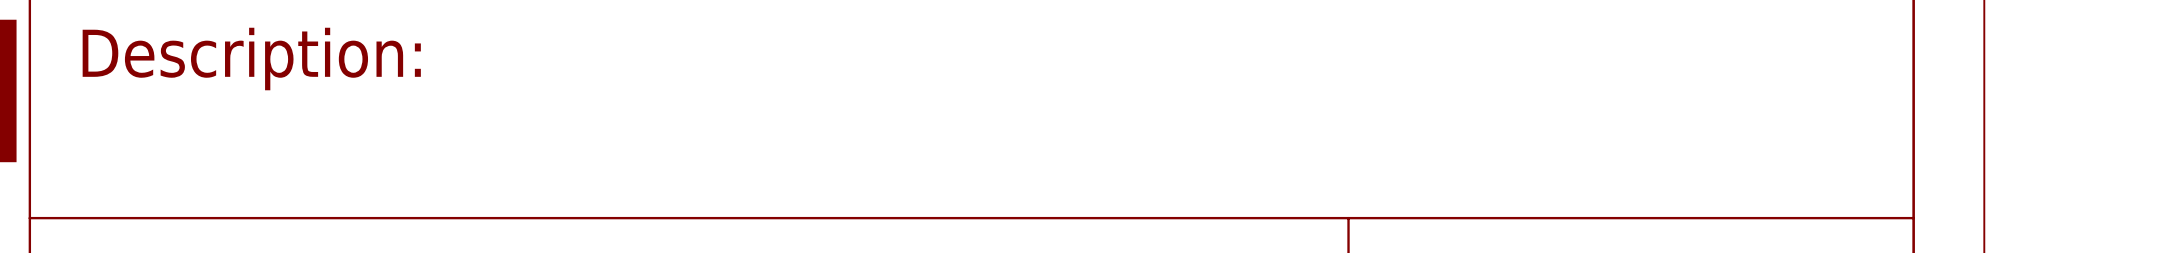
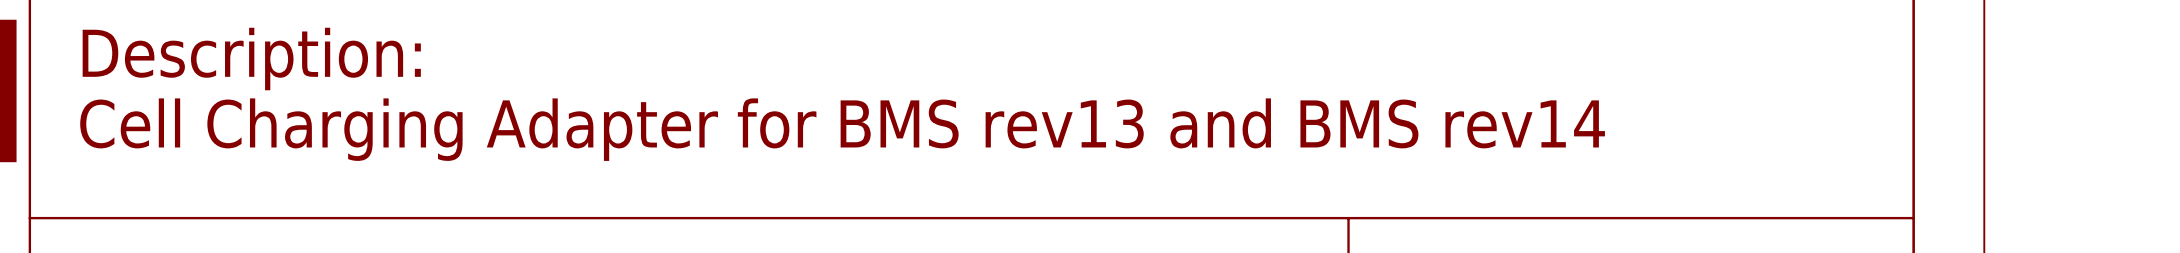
text: none -> Cell Charging Adapter for BMS rev13 and BMS rev14 (842, 129)

